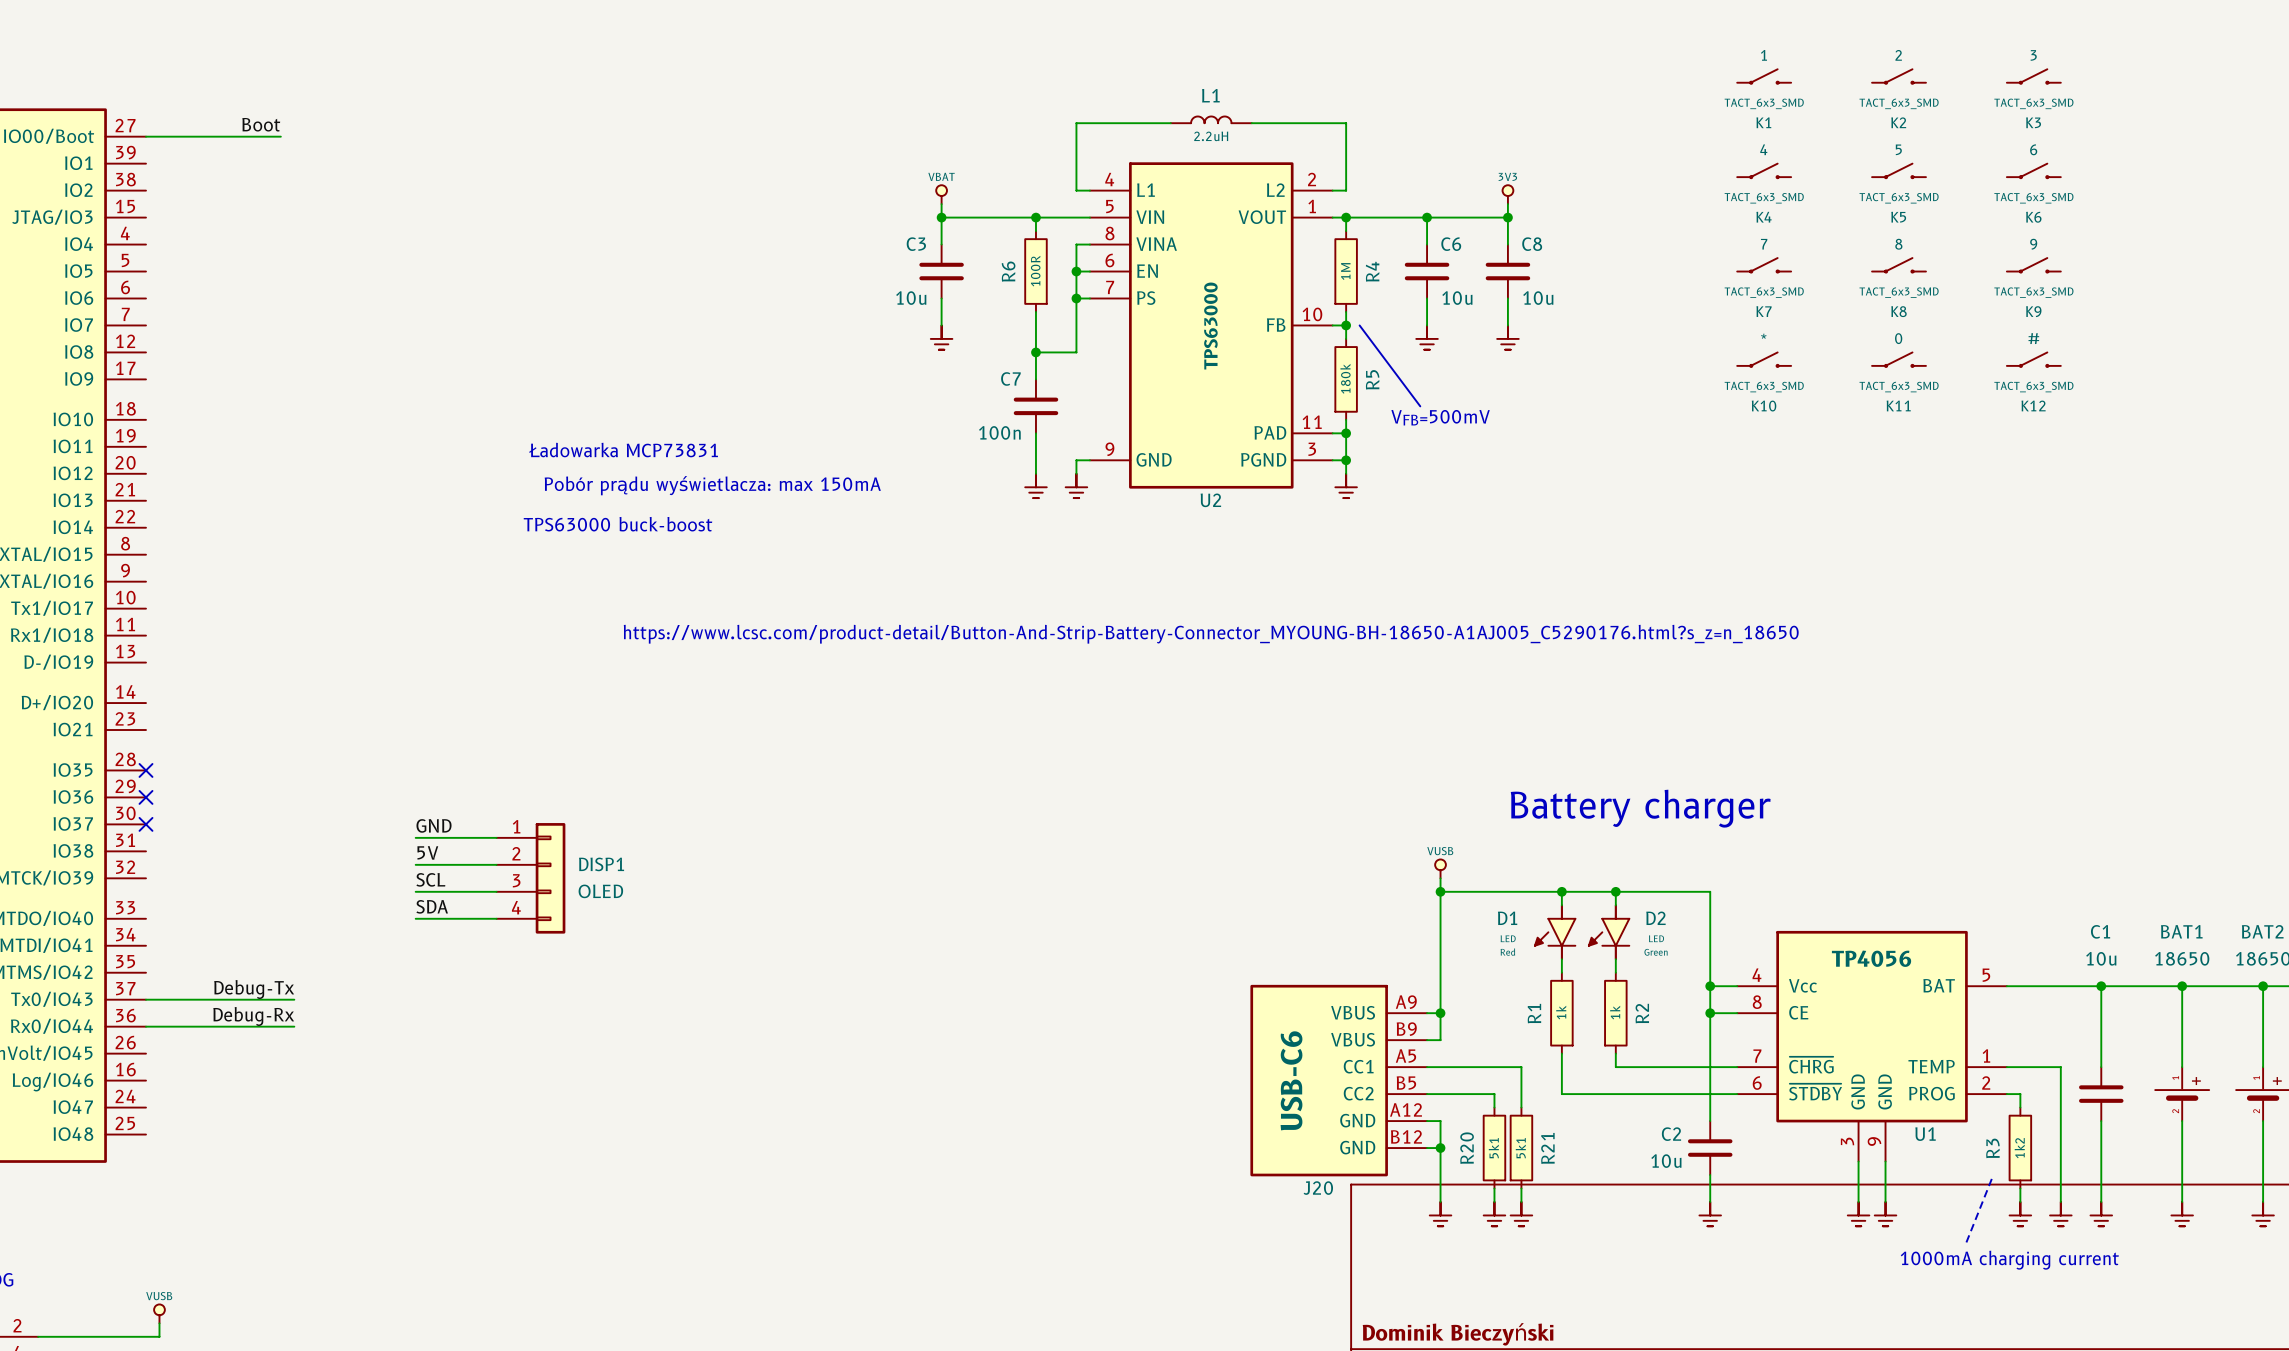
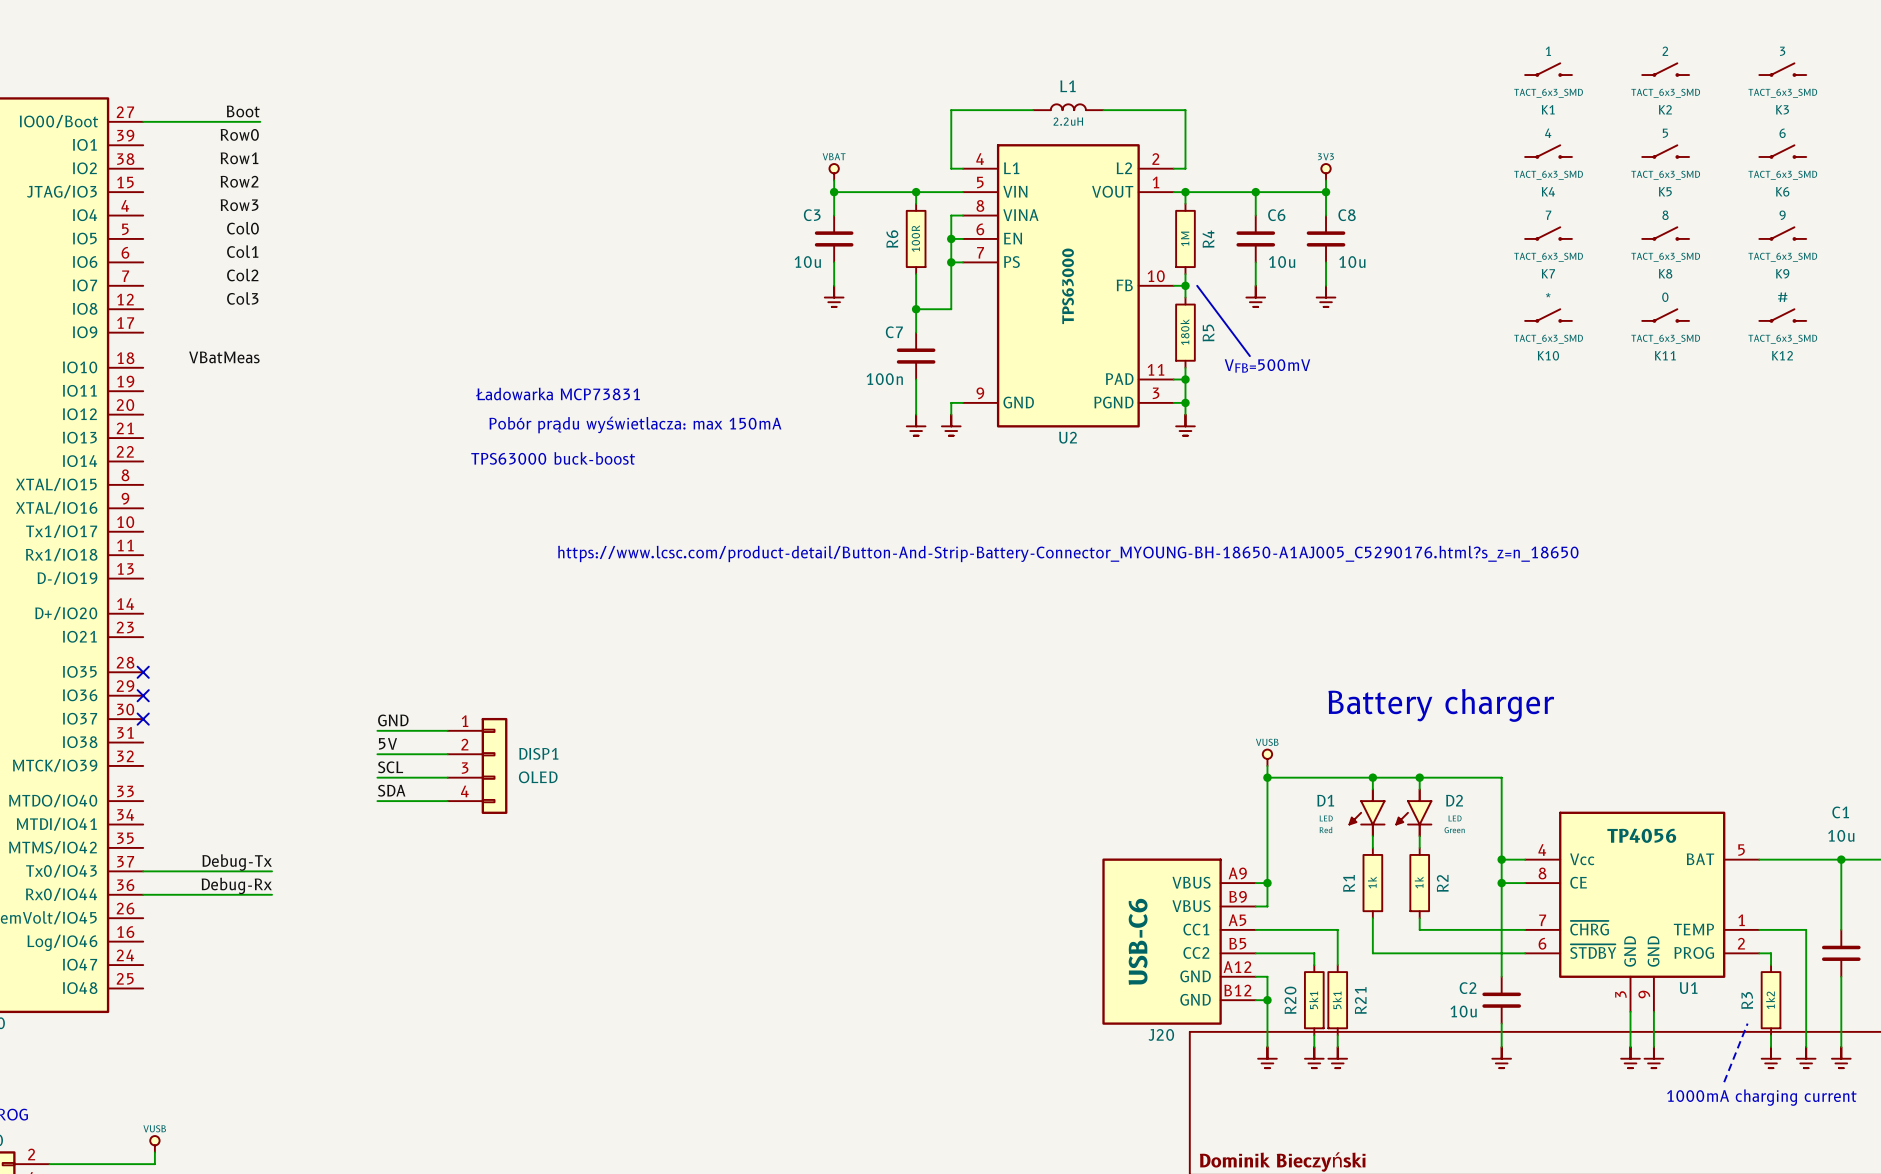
label: none -> Row0 (239, 134)
label: none -> Row1 (239, 158)
label: none -> Row2 (239, 181)
label: none -> Row3 (239, 205)
label: none -> Col0 (242, 228)
label: none -> Col1 (242, 251)
label: none -> Col2 (242, 275)
label: none -> Col3 (242, 298)
label: none -> VBatMeas (224, 357)

